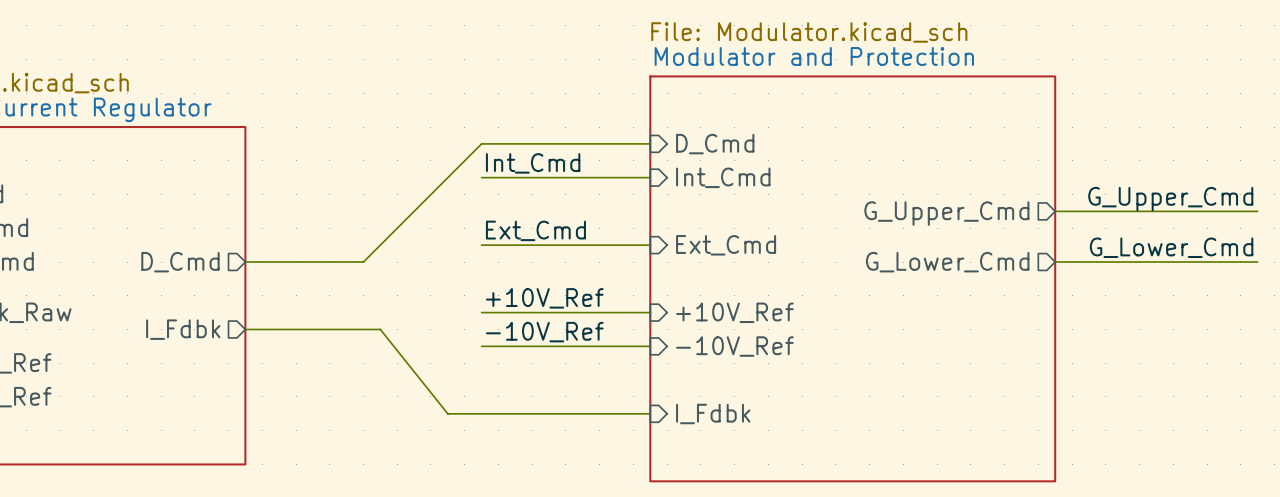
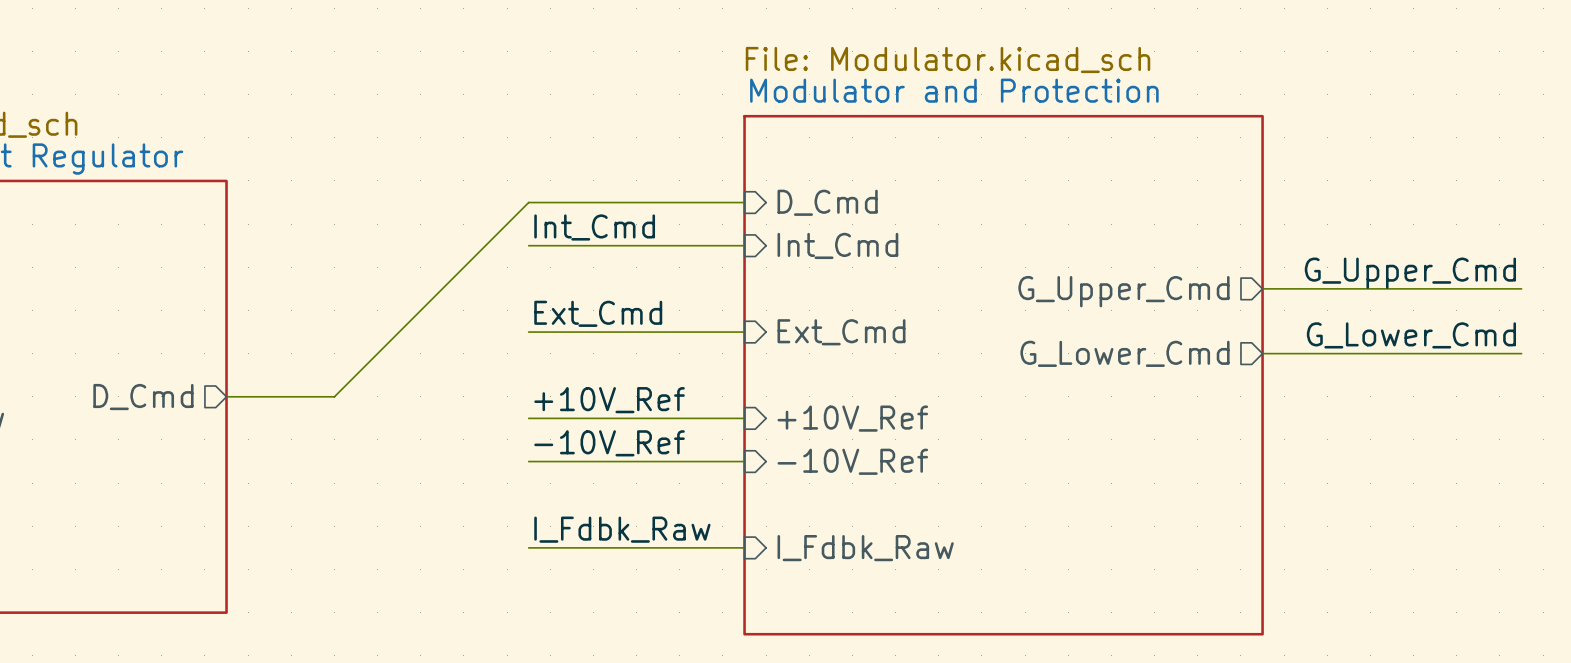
sheet pin position: D_Cmd (180, 262) -> D_Cmd (143, 397)
wire: (245, 262) (363, 262) -> (226, 396) (334, 396) (377, 353)
sheet pin: I_Fdbk (183, 329) -> none
wire: (245, 329) (380, 329) (447, 413) (481, 413) -> none
label: none -> I_Fdbk_Raw (622, 529)
sheet pin: I_Fdbk (713, 414) -> I_Fdbk_Raw (865, 548)

